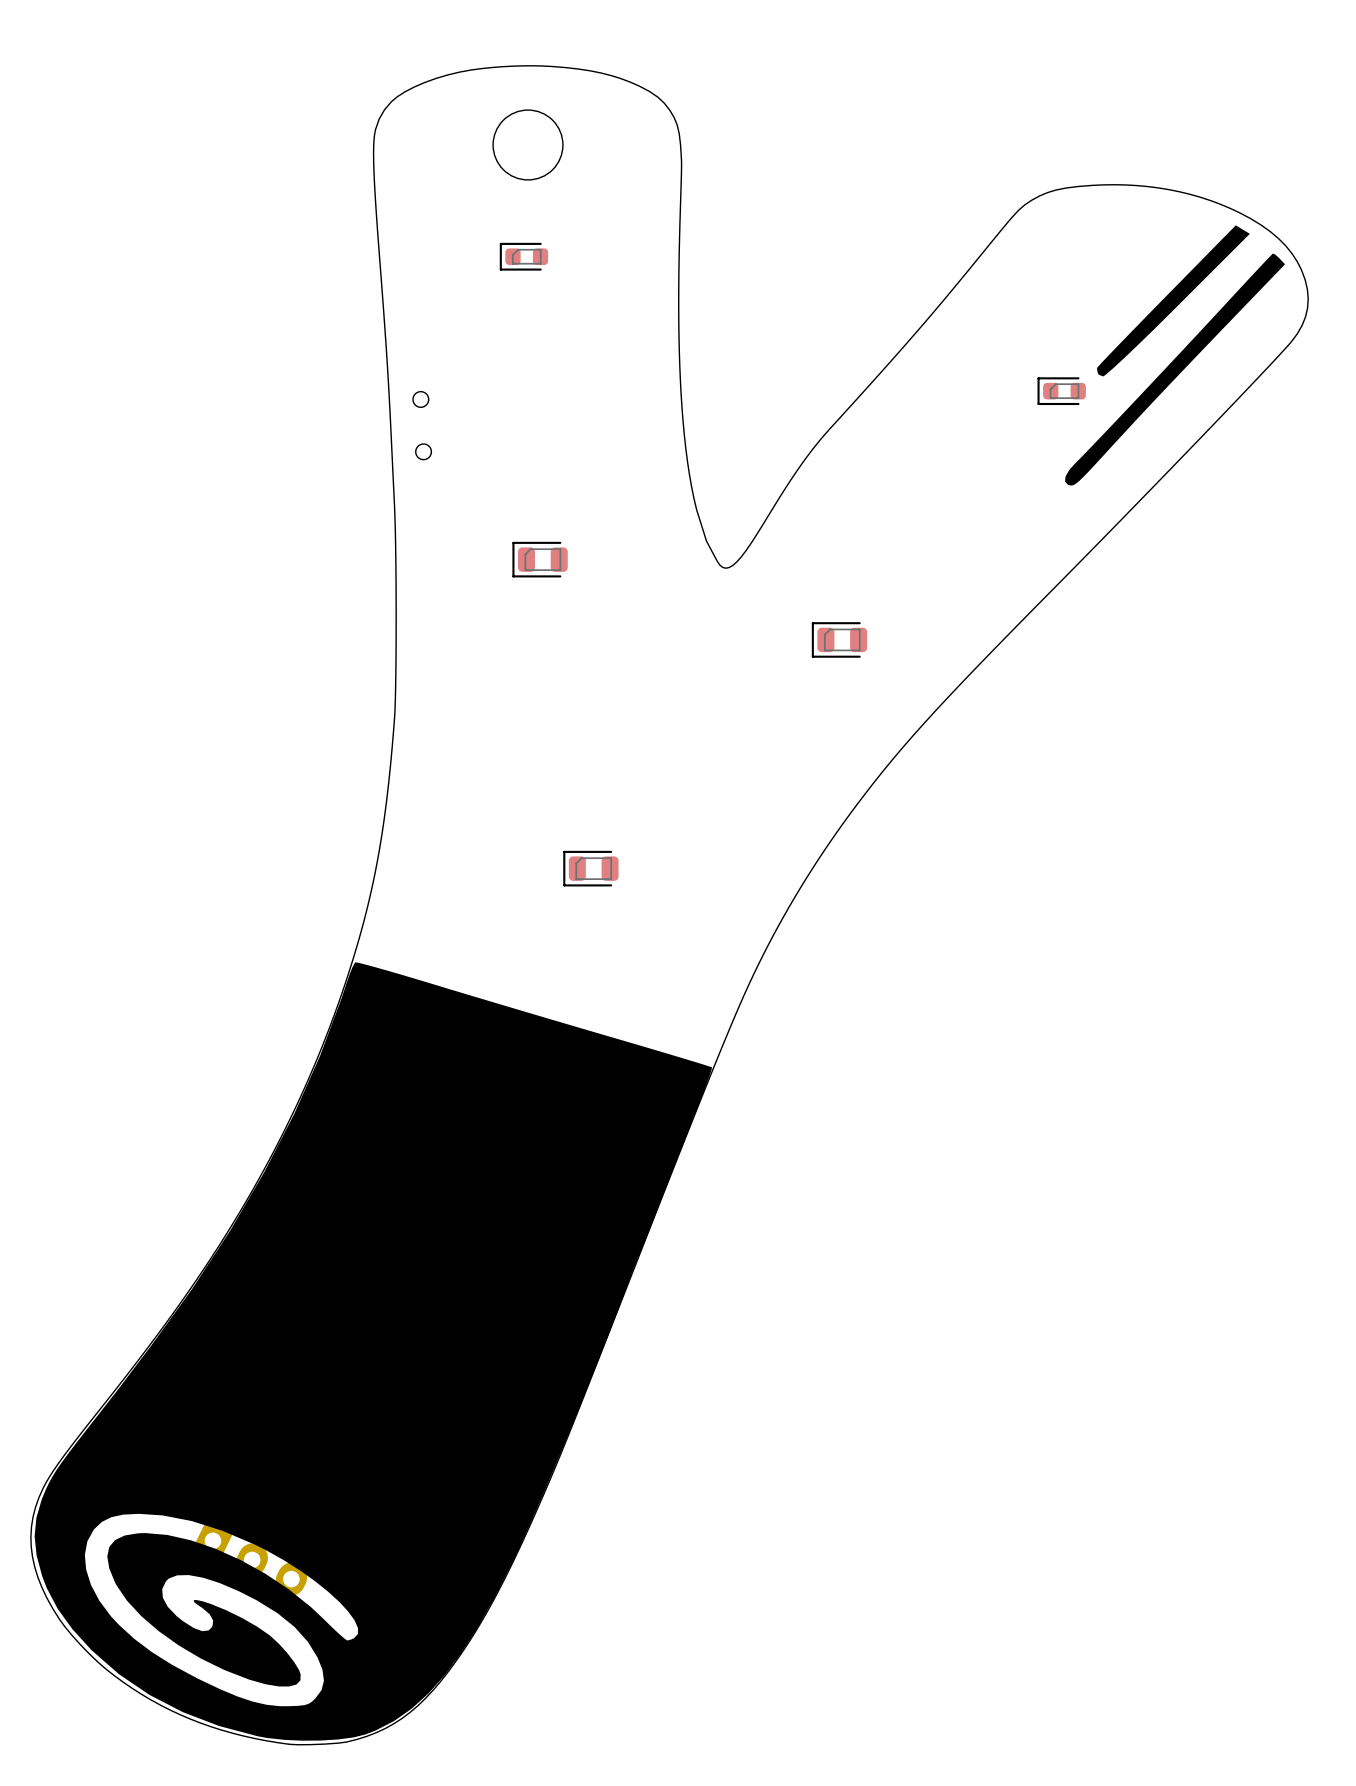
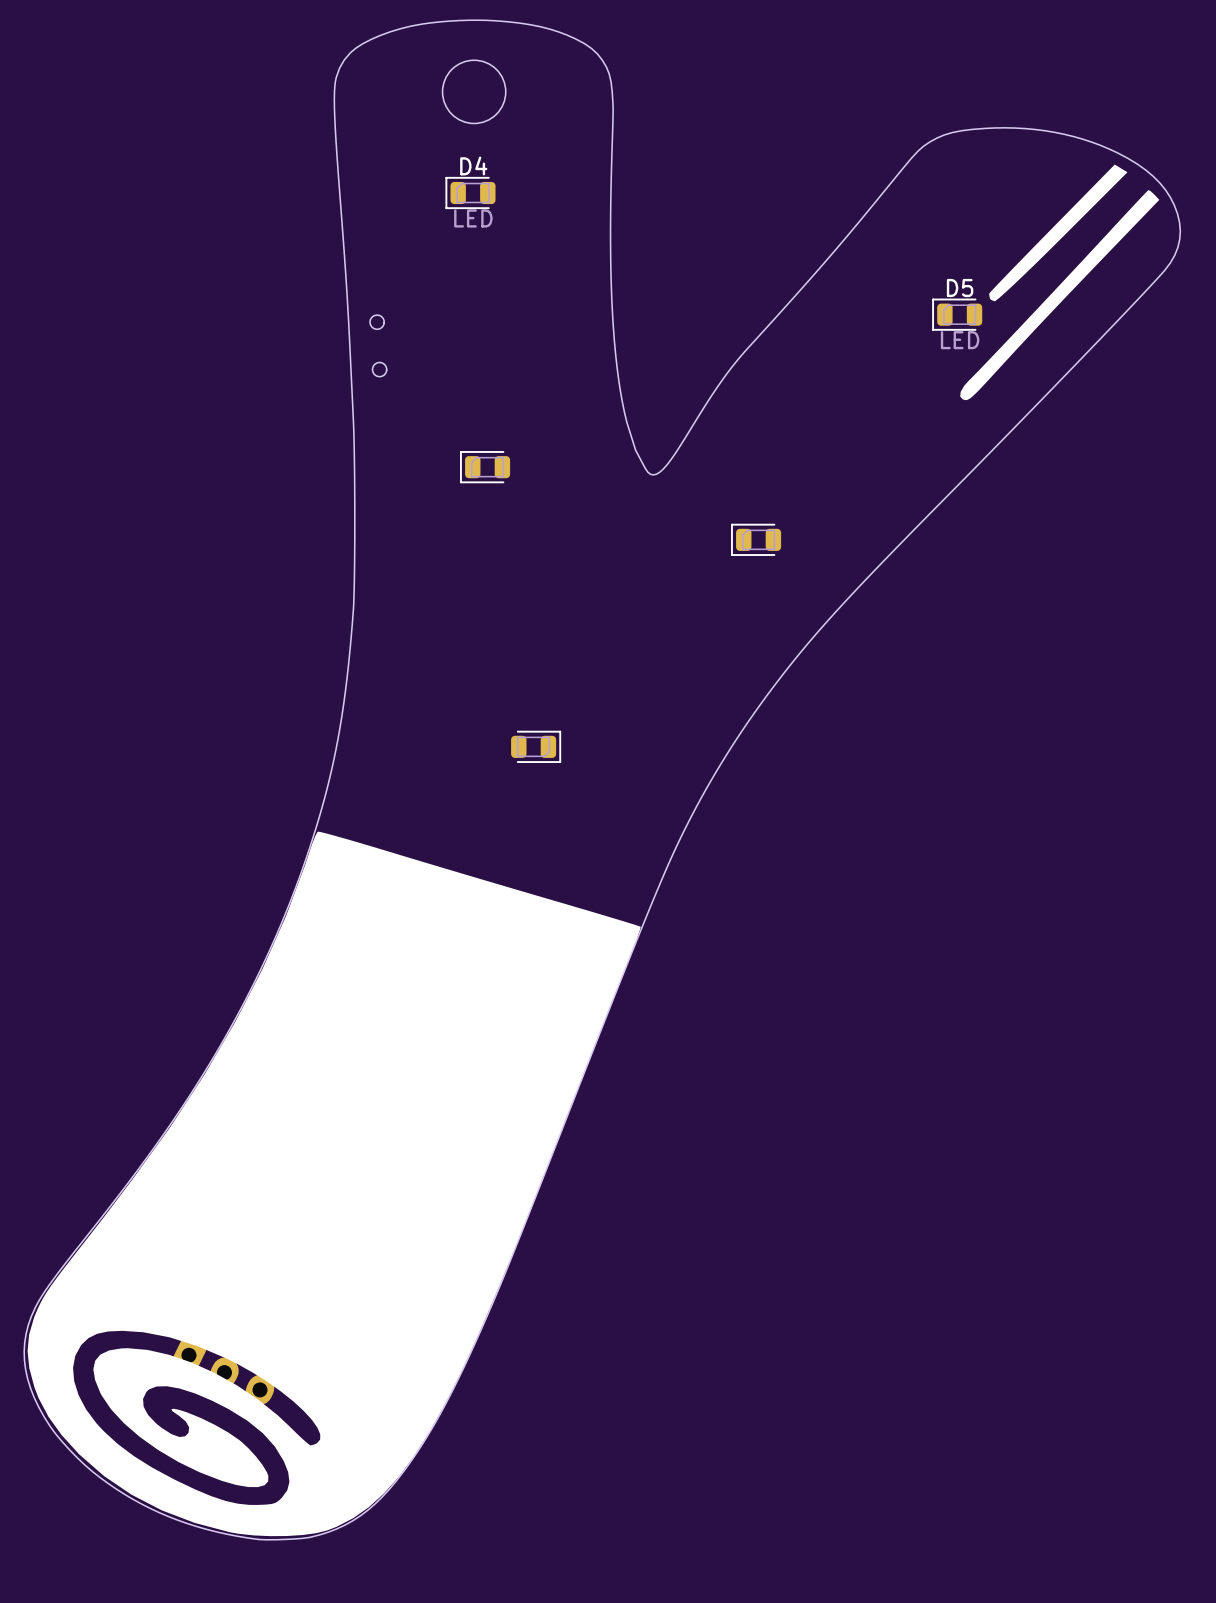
part: (523, 256) -> none
D4: none -> LED (470, 192)
part: (1061, 391) -> none
D5: none -> LED (957, 314)
part rotation: 0° (590, 868) -> 180° (536, 746)

